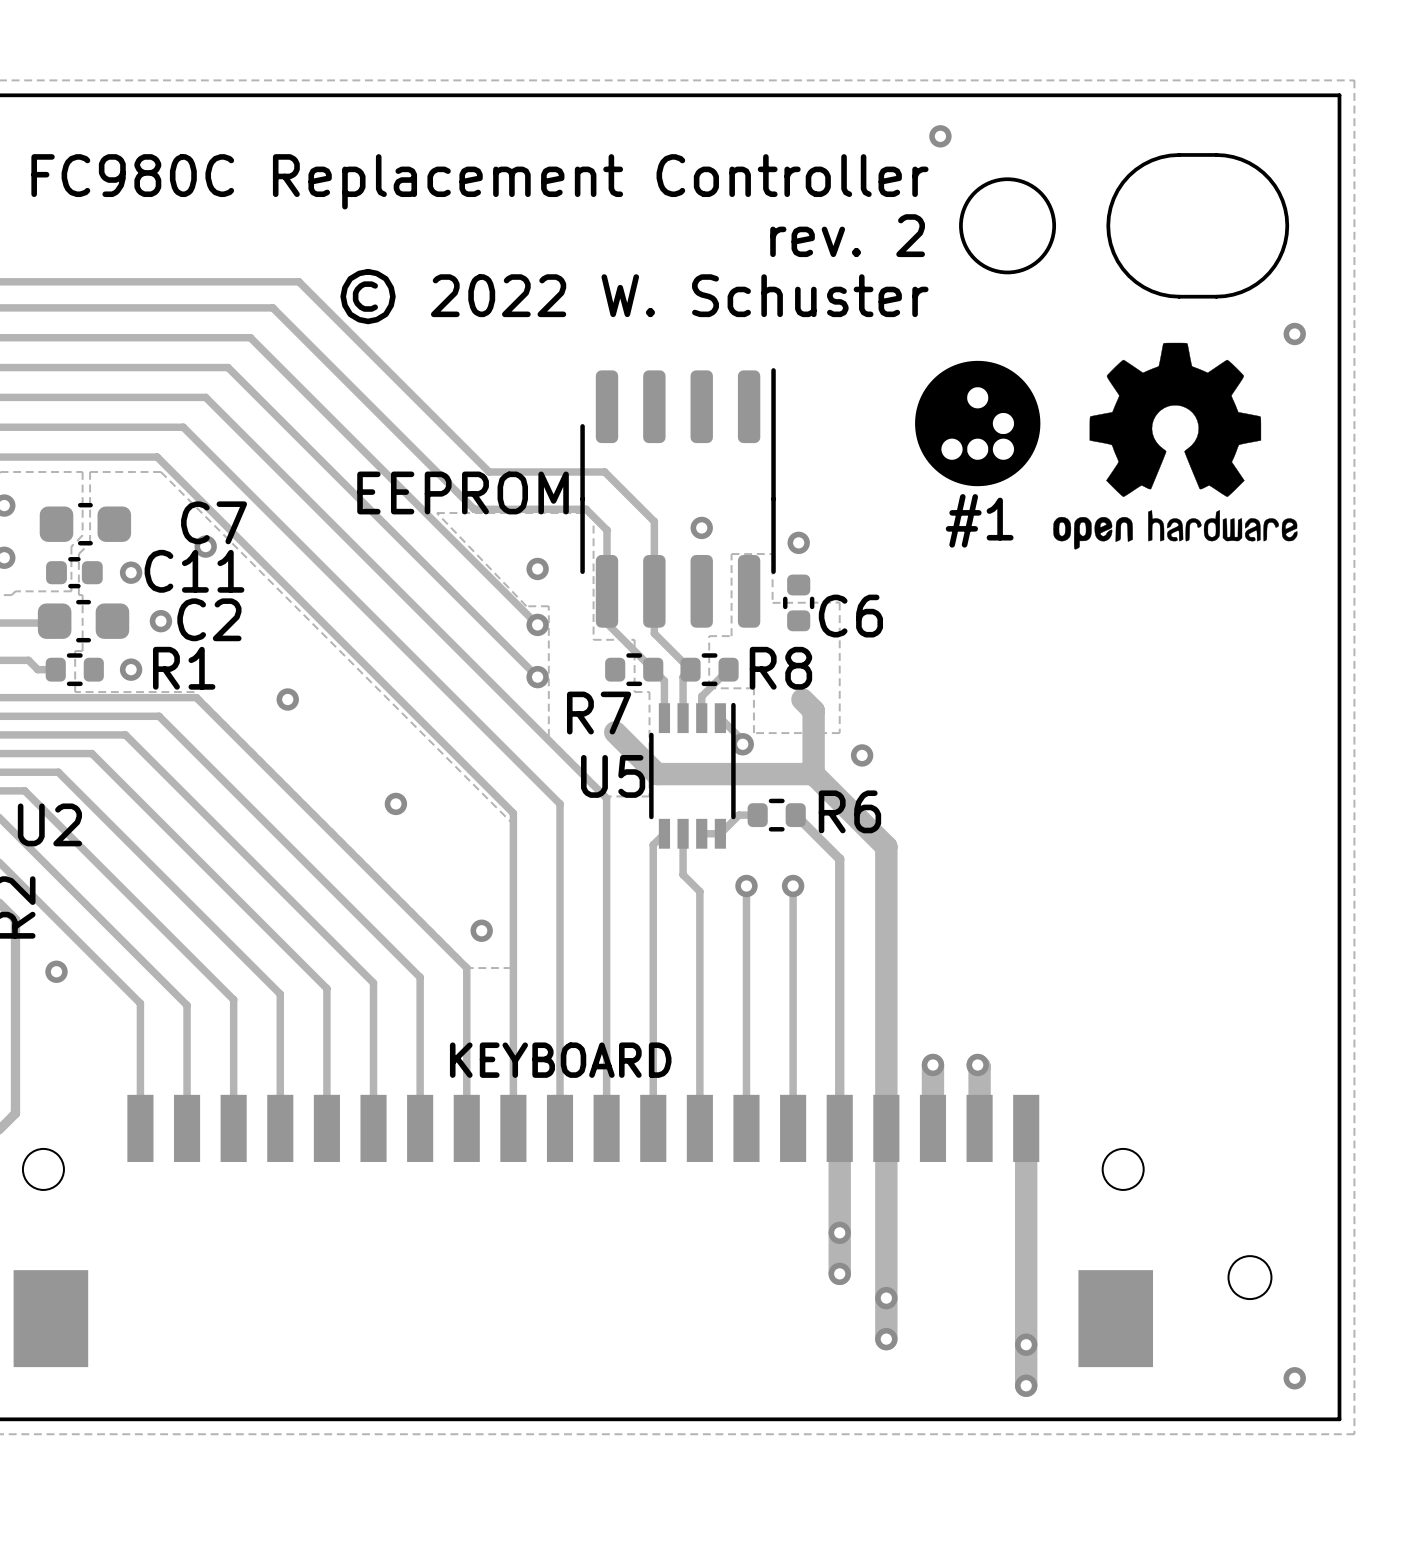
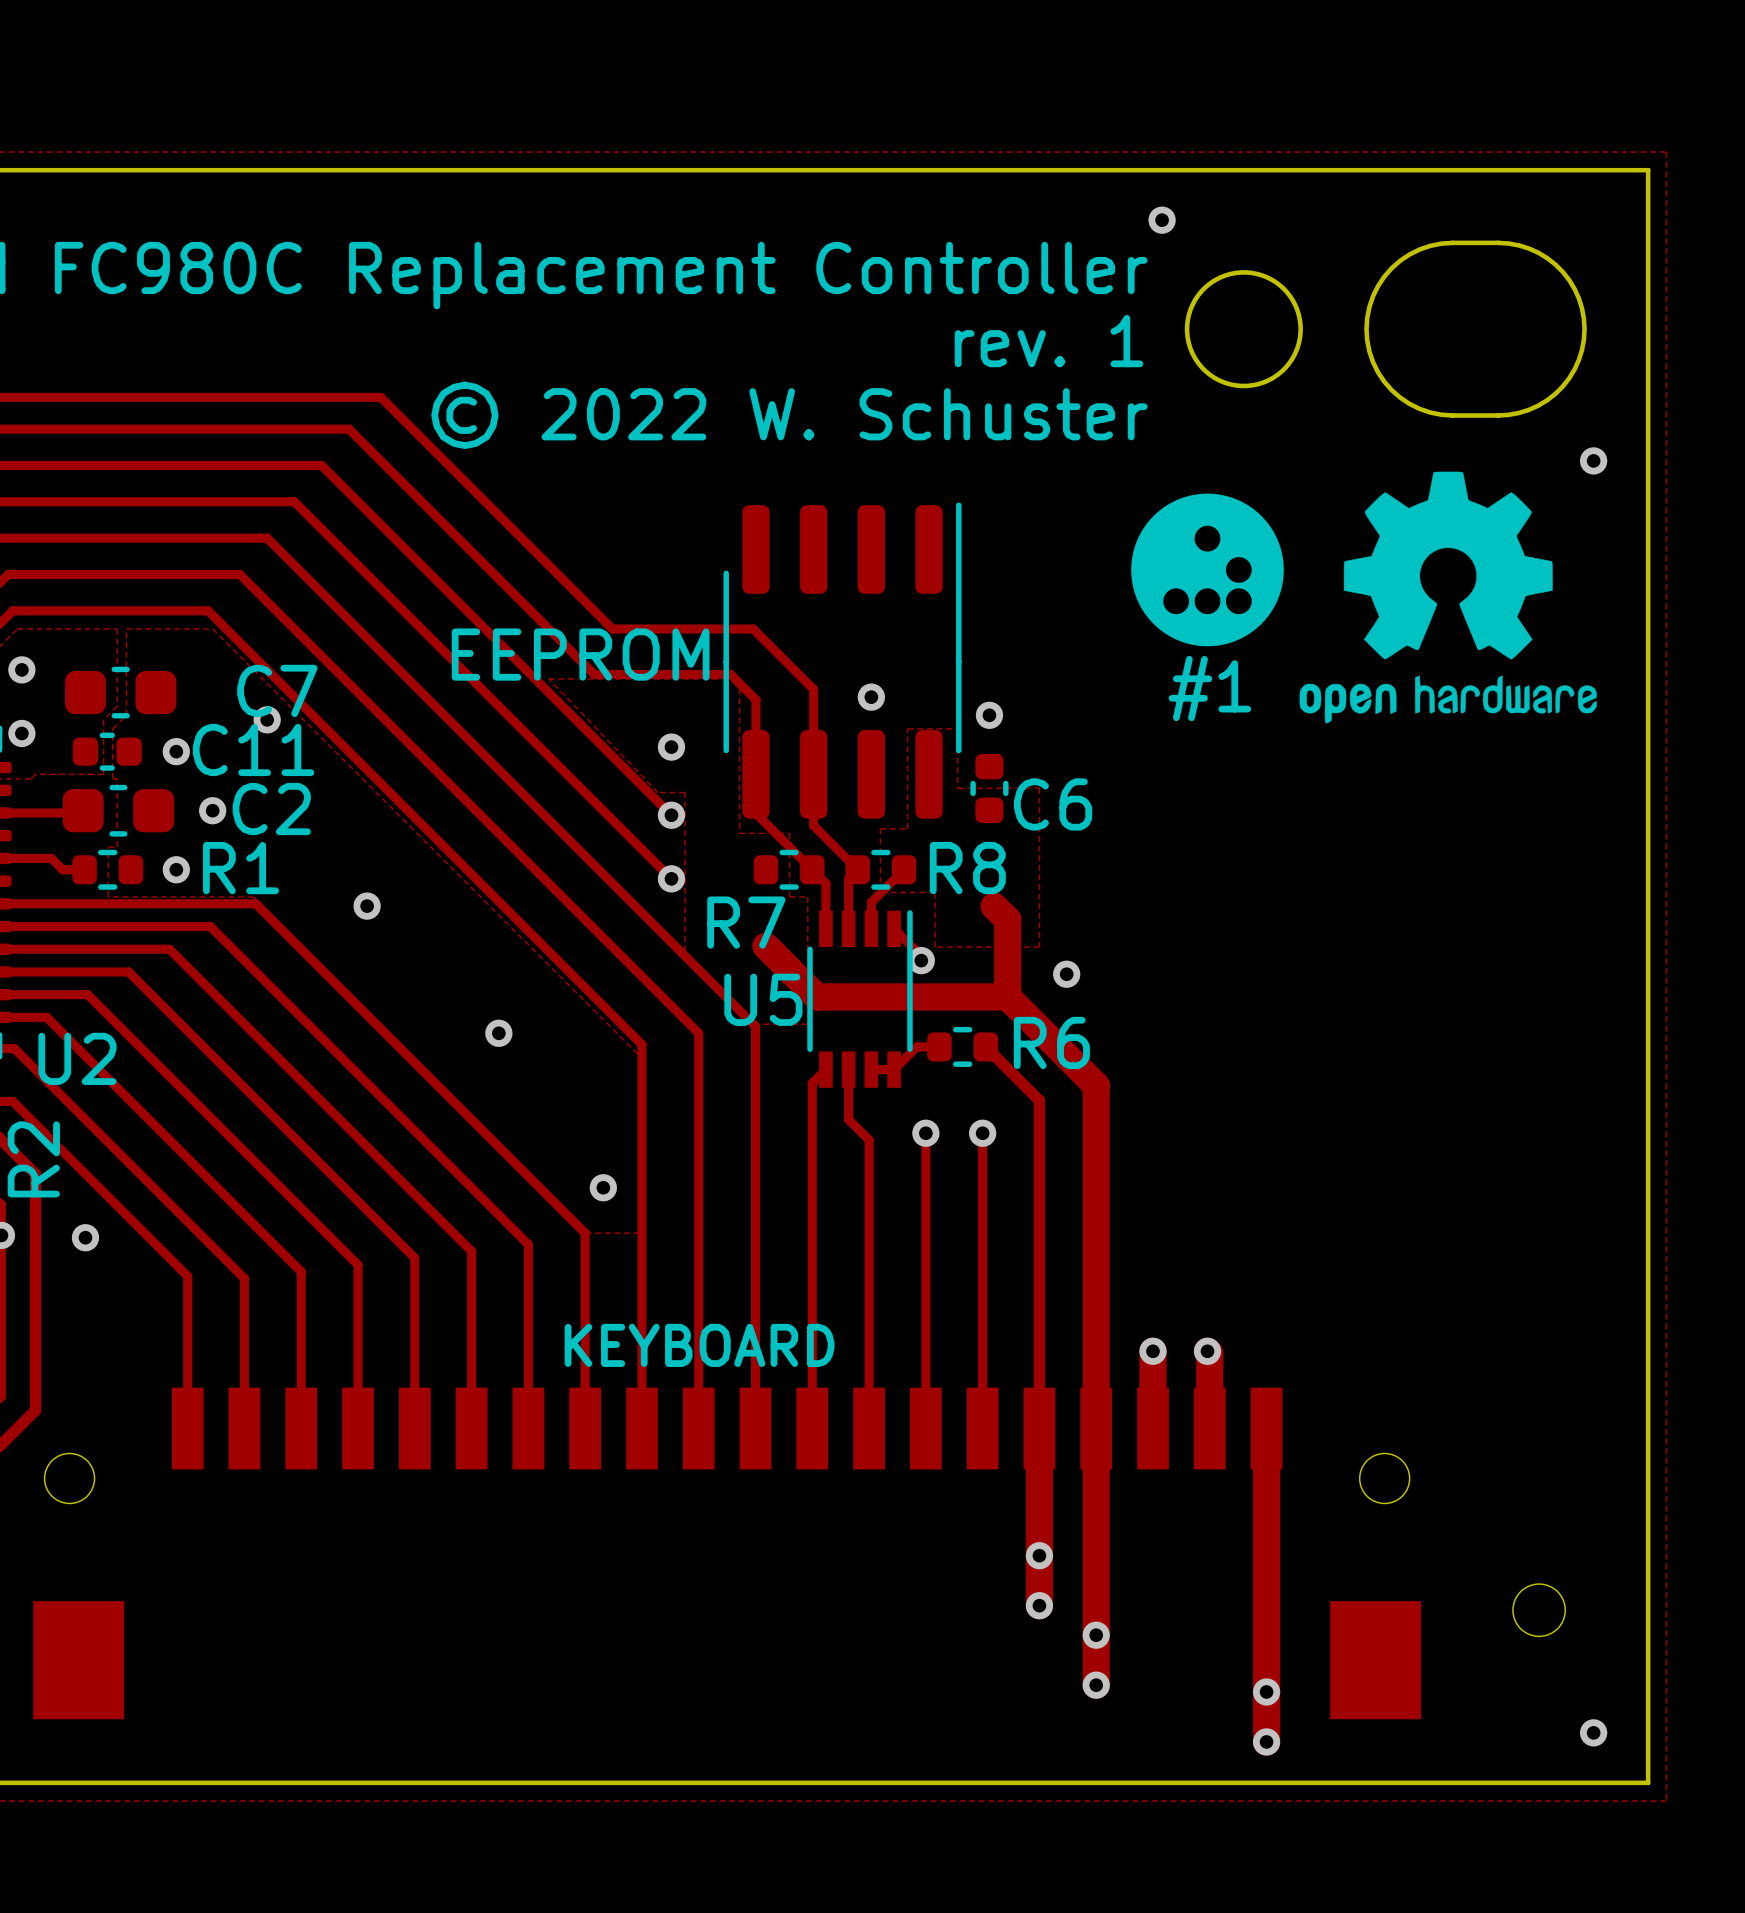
text: rev. 2 (847, 235) -> rev. 1 (1049, 341)

